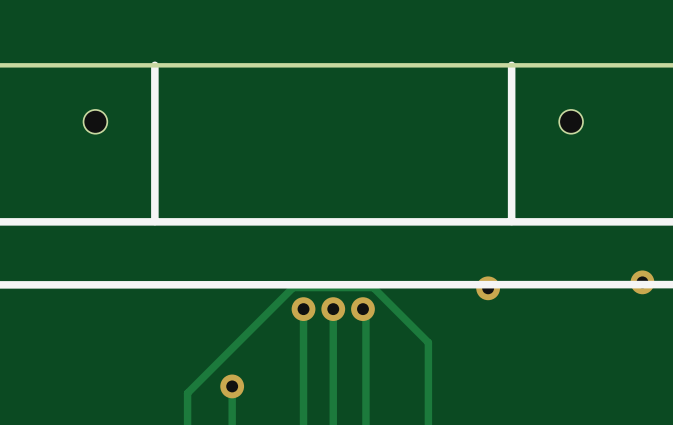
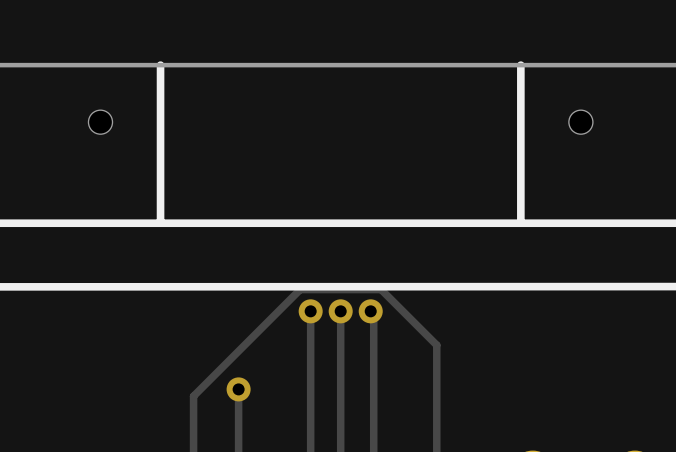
via: (642, 282) -> none
via: (488, 288) -> none

